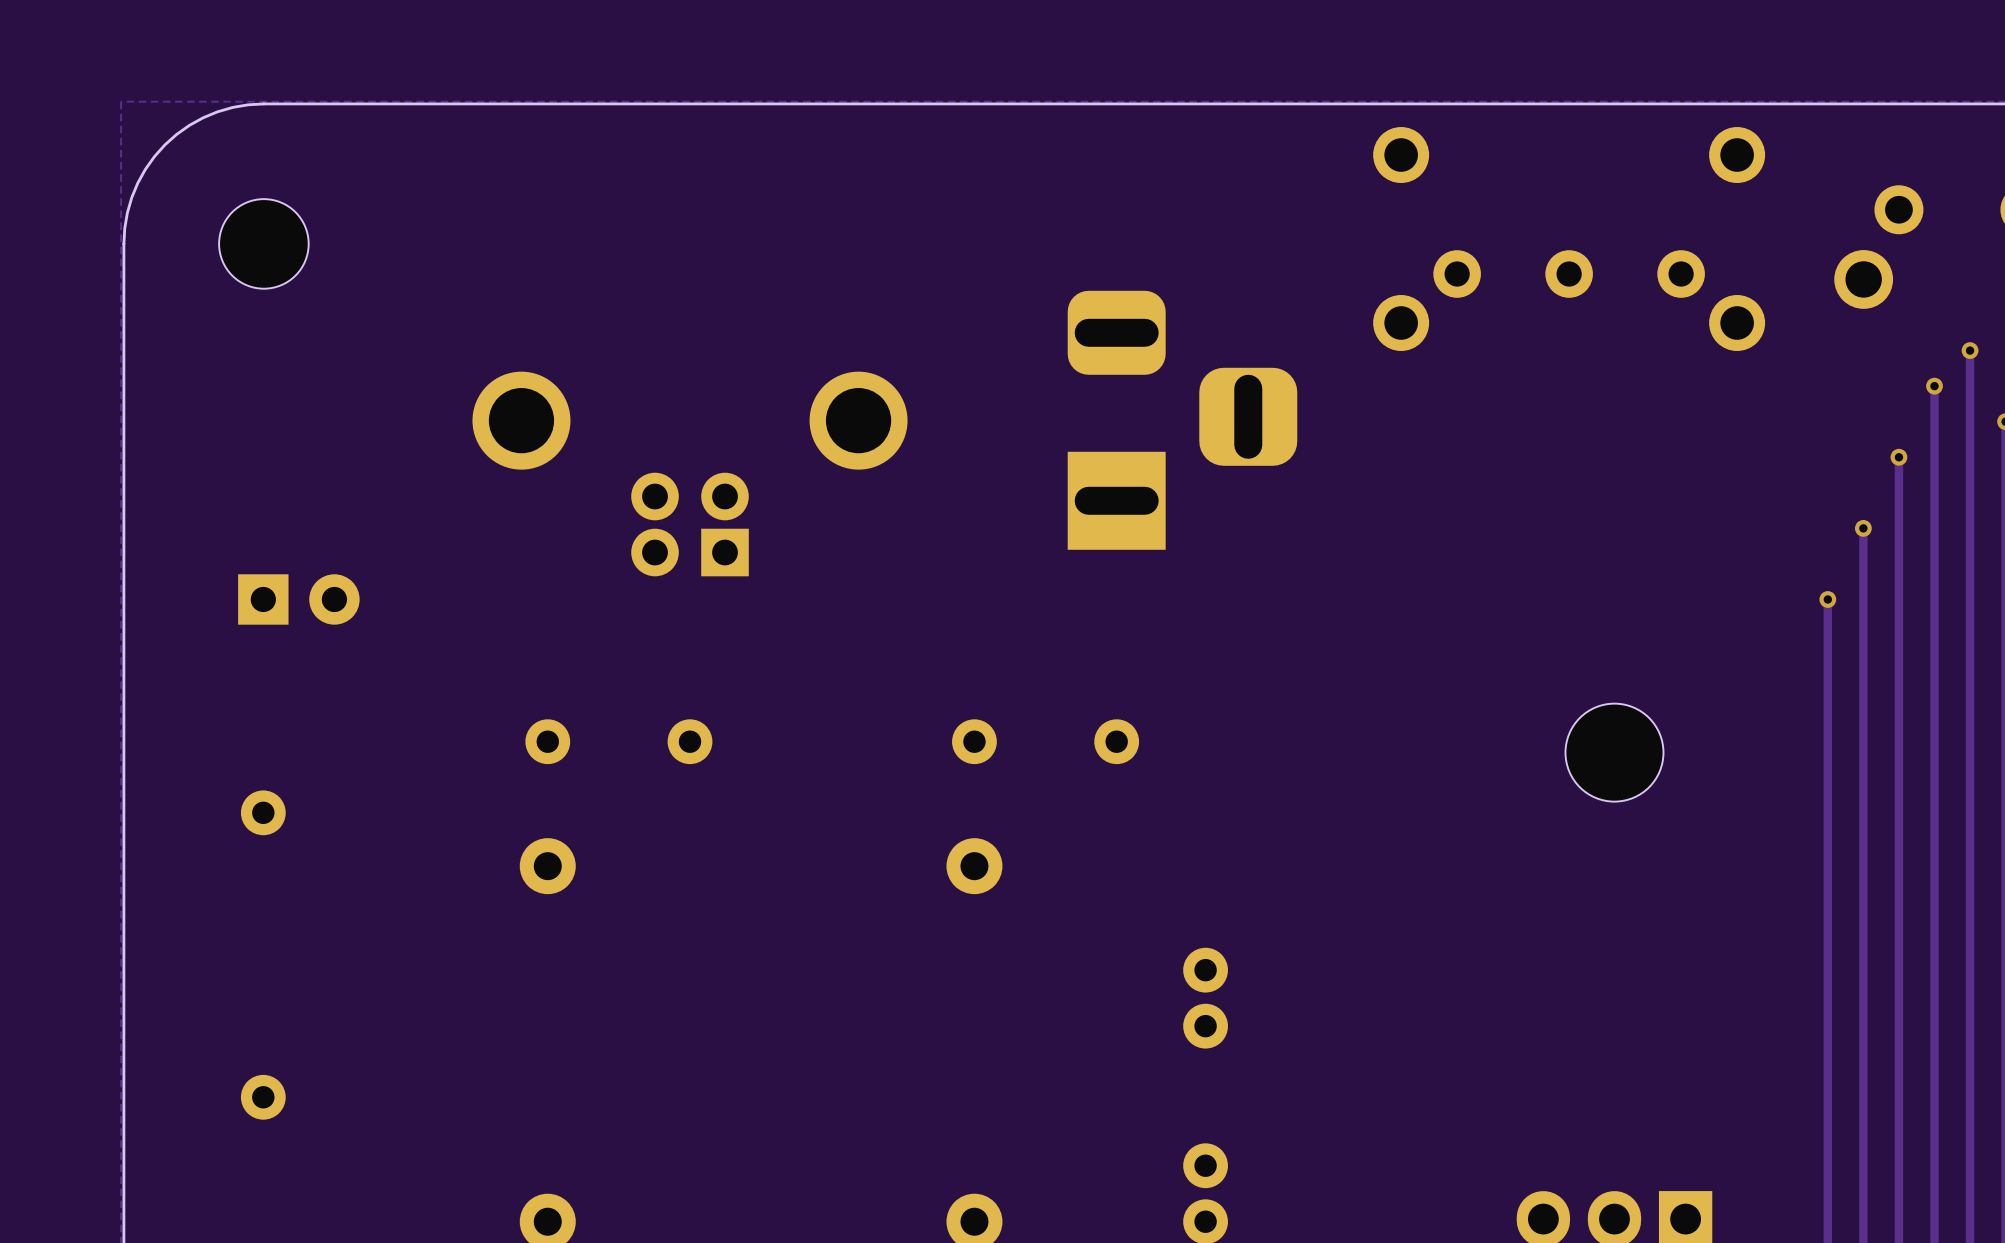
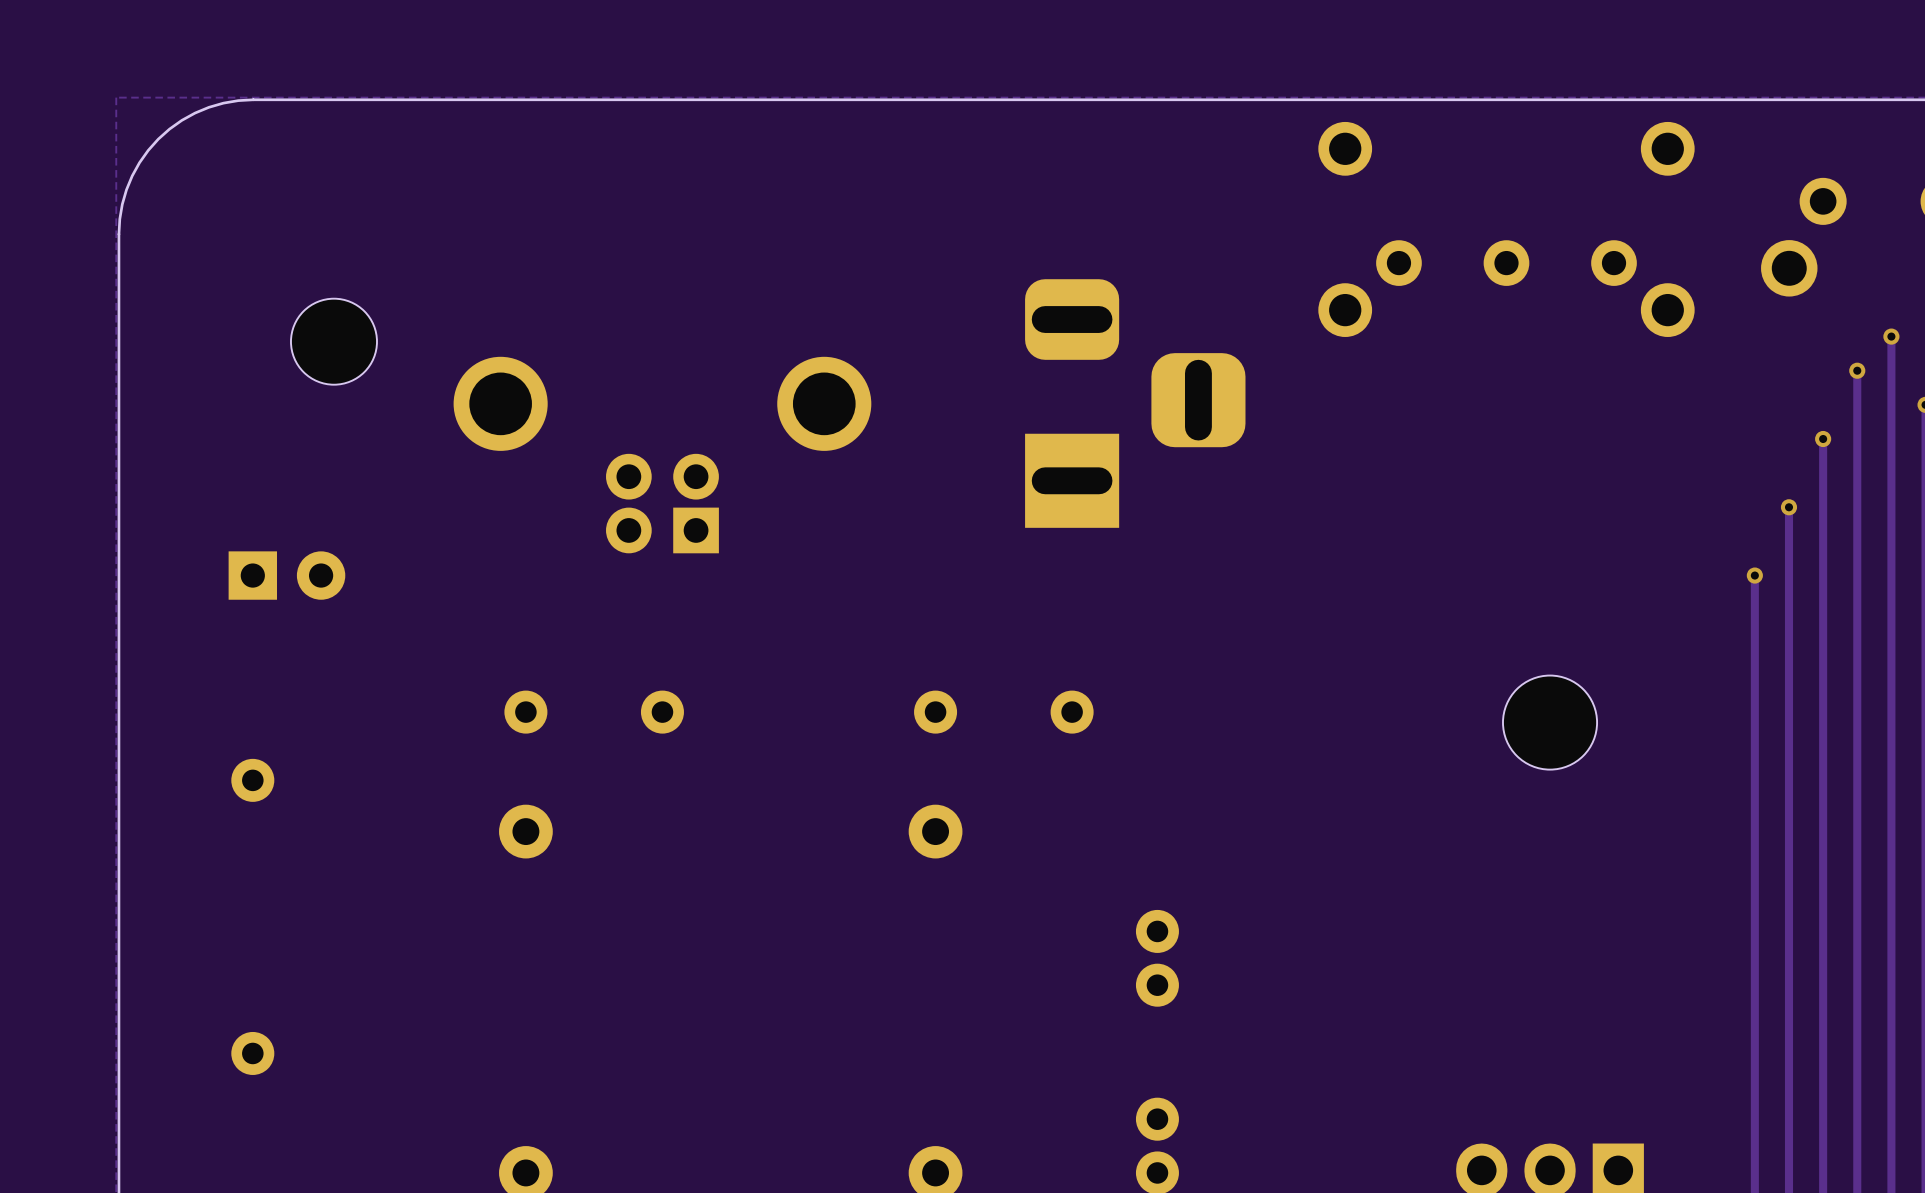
part position: (263, 243) -> (333, 341)

